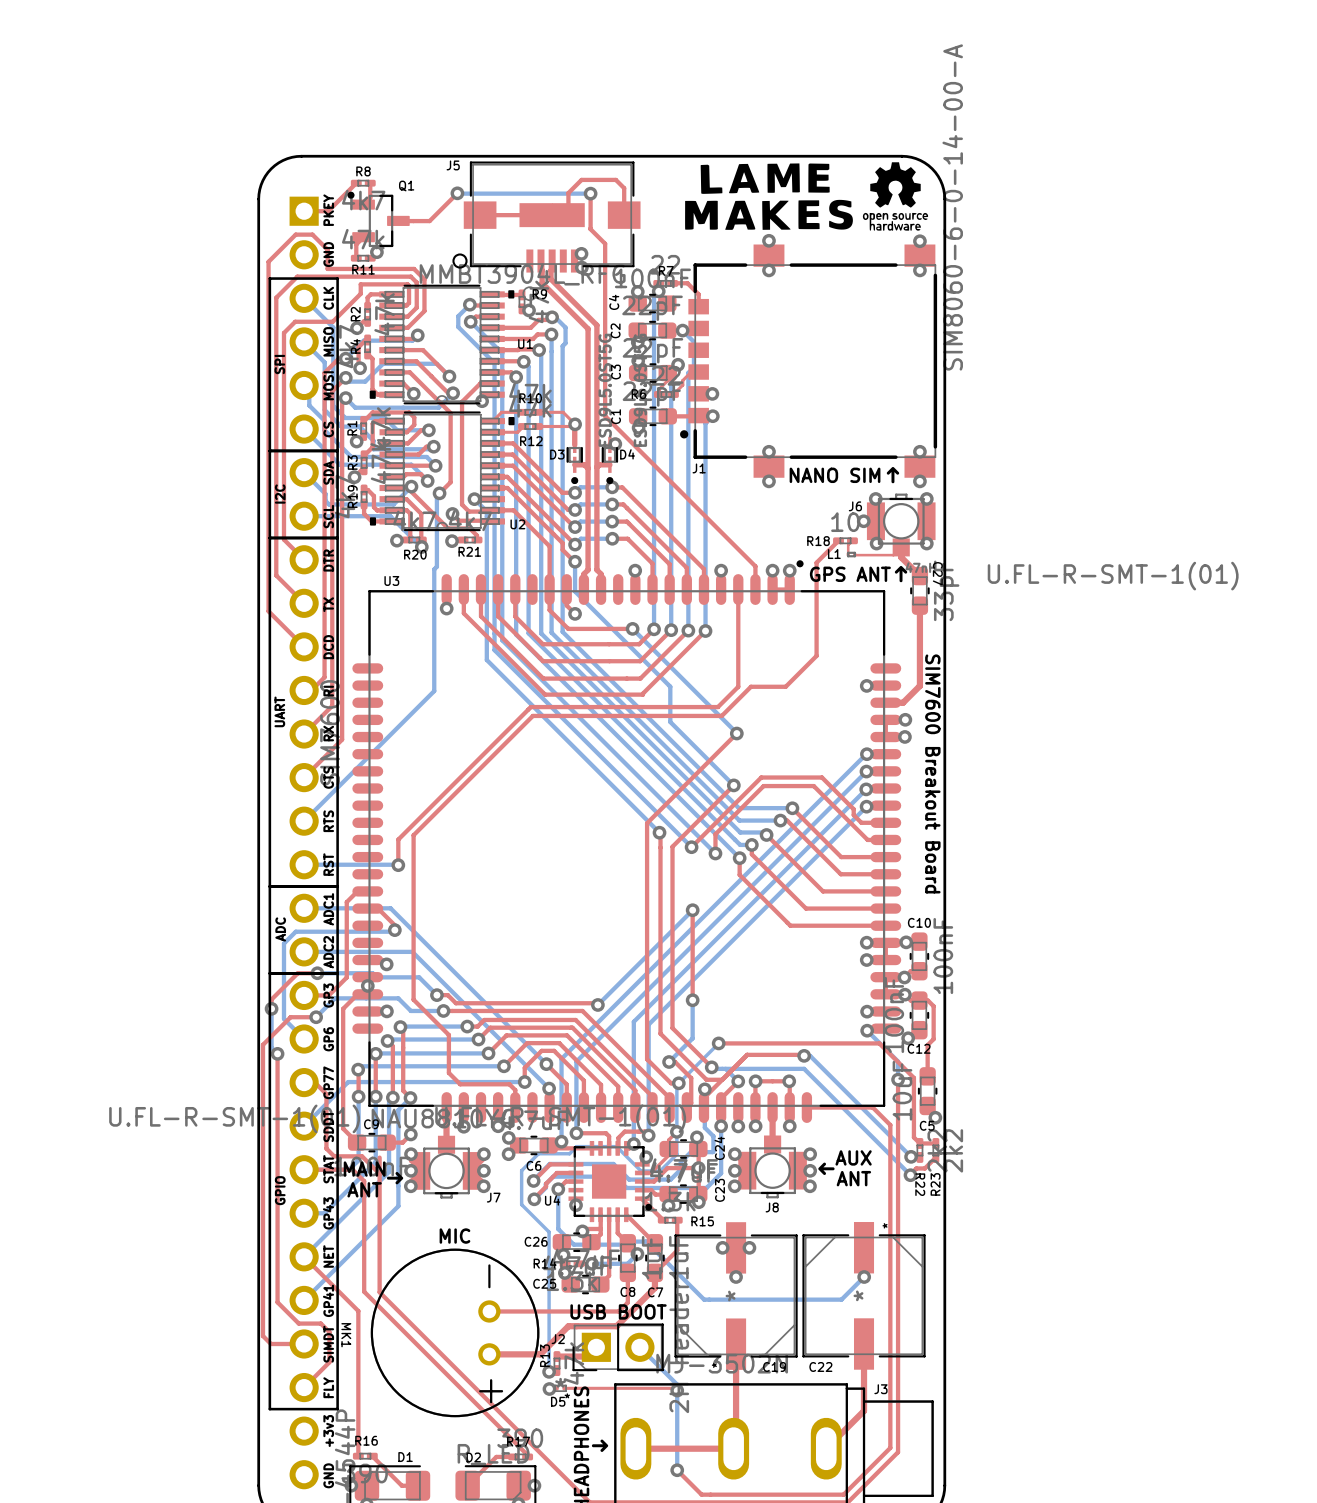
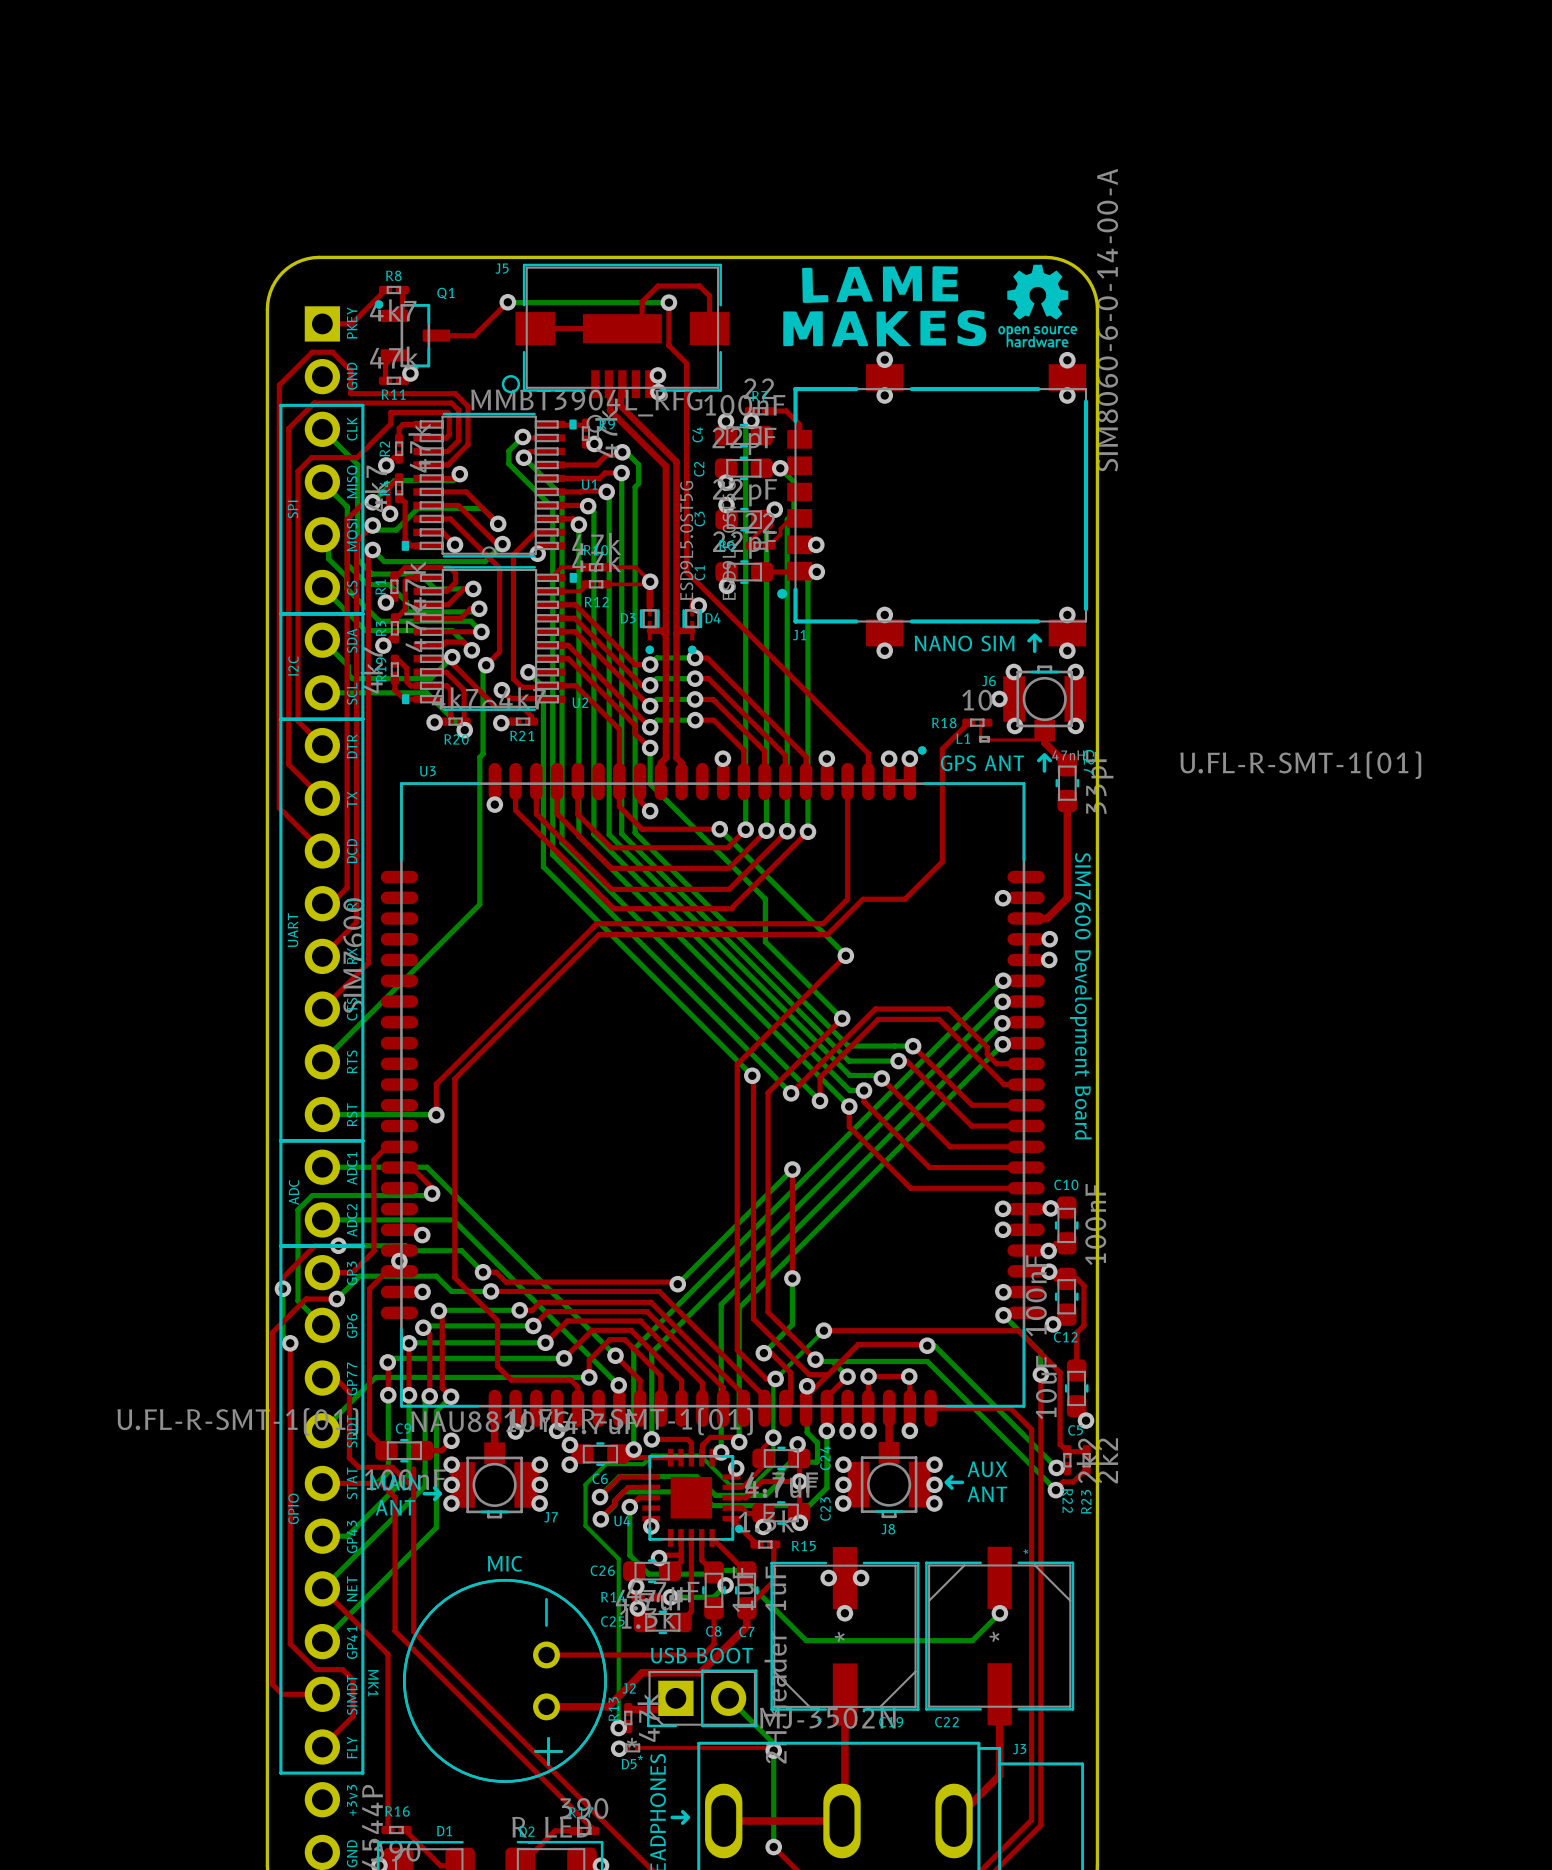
text: SIM7600 Breakout Board (932, 773) -> SIM7600 Development Board (1080, 996)

